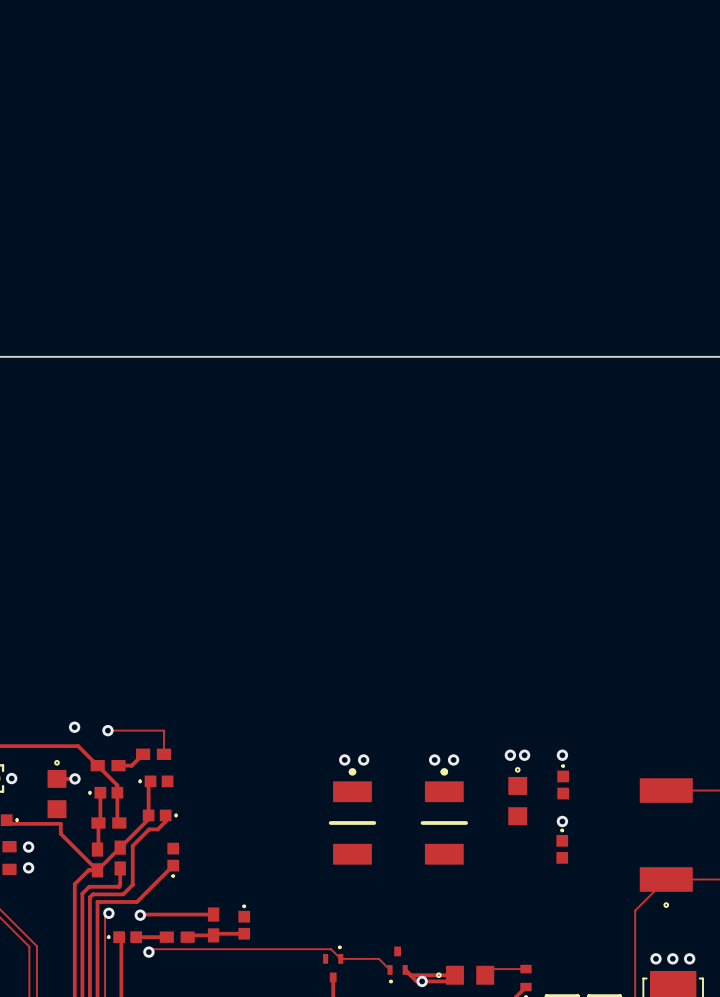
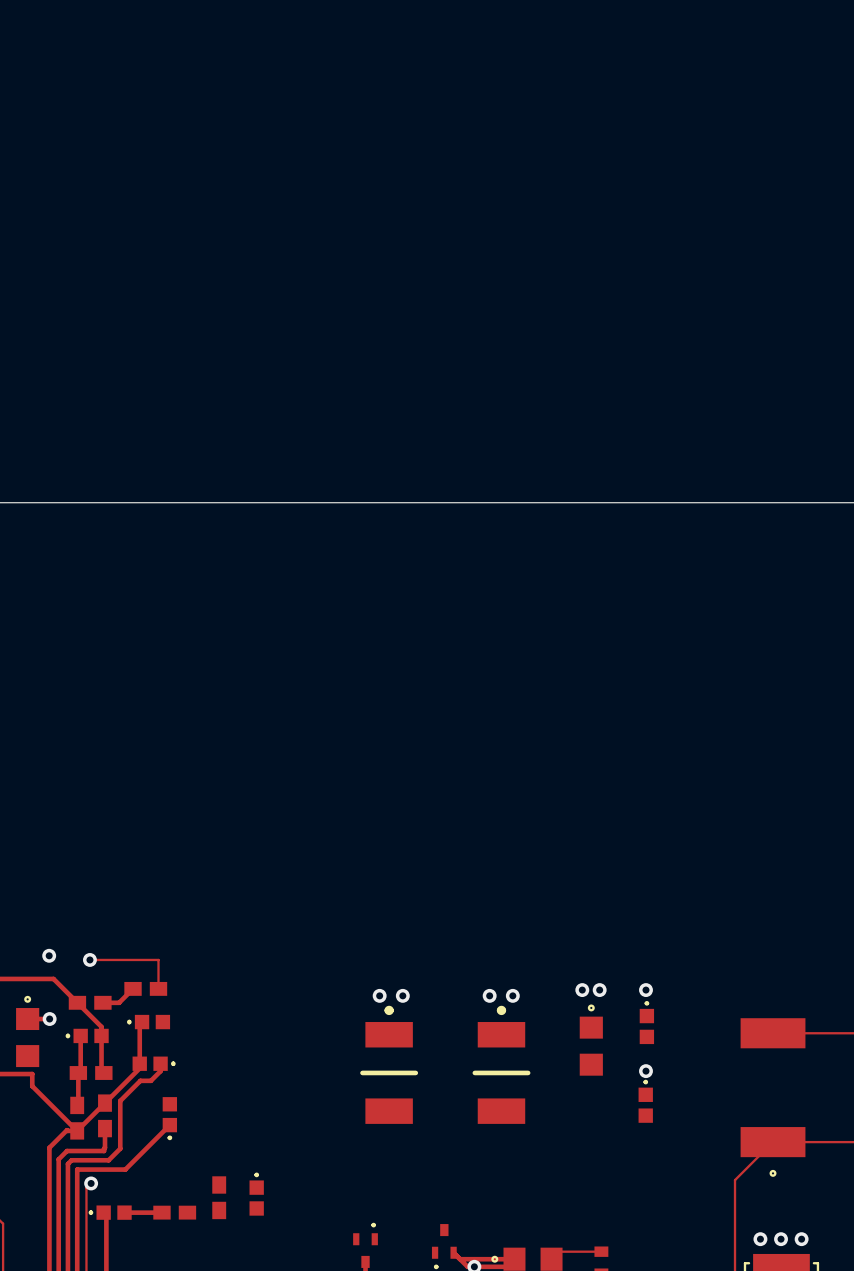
track: (213, 914) (140, 915) -> none
via: (140, 915) -> none
track: (244, 933) (215, 933) (213, 935) (189, 935) (187, 937) -> none
track: (148, 952) (151, 949) (331, 949) (340, 958) (378, 958) (390, 969) -> none
via: (148, 952) -> none

